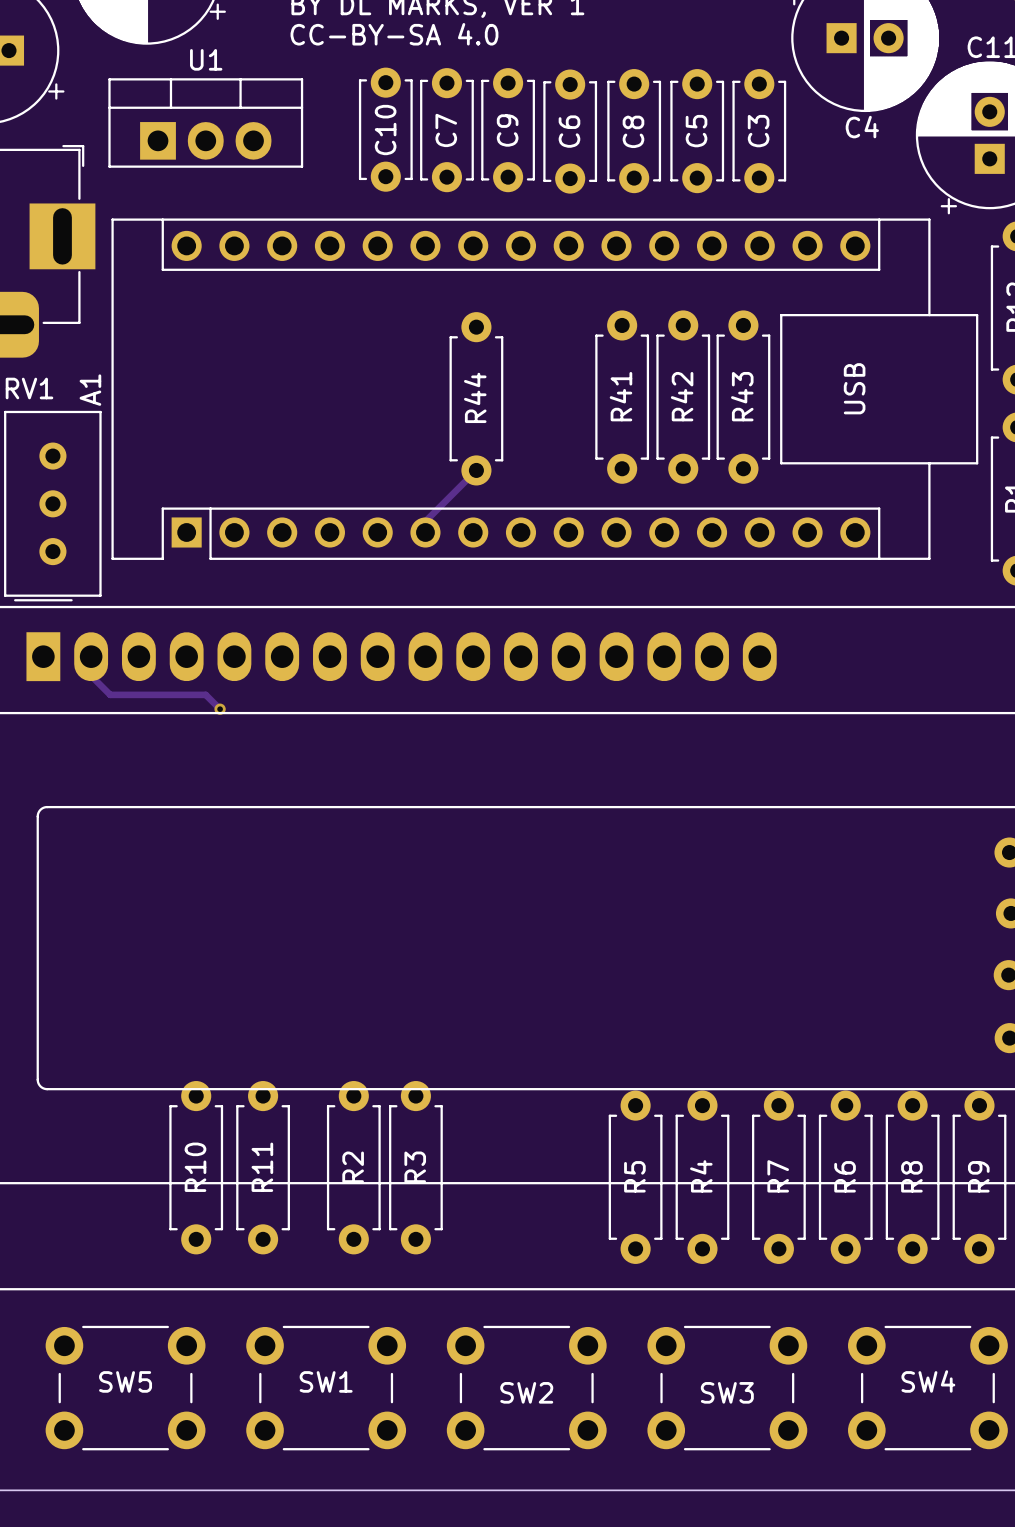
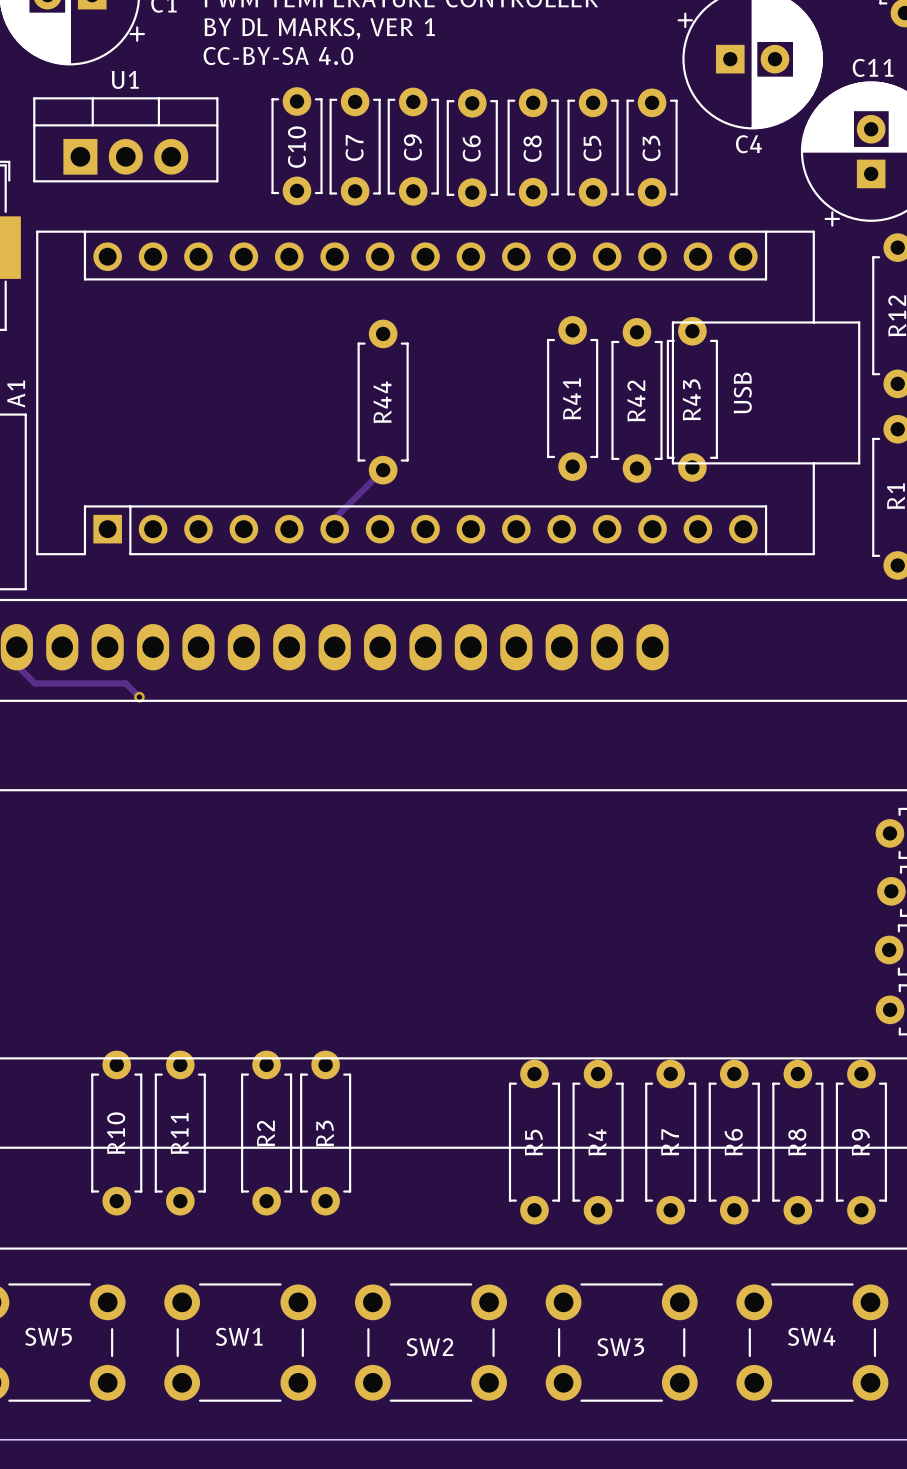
R43: none -> (692, 399)
R43 name: R43 (742, 396) -> R42 (636, 400)
R41 position: (622, 397) -> (572, 398)
R42: (683, 397) -> none

